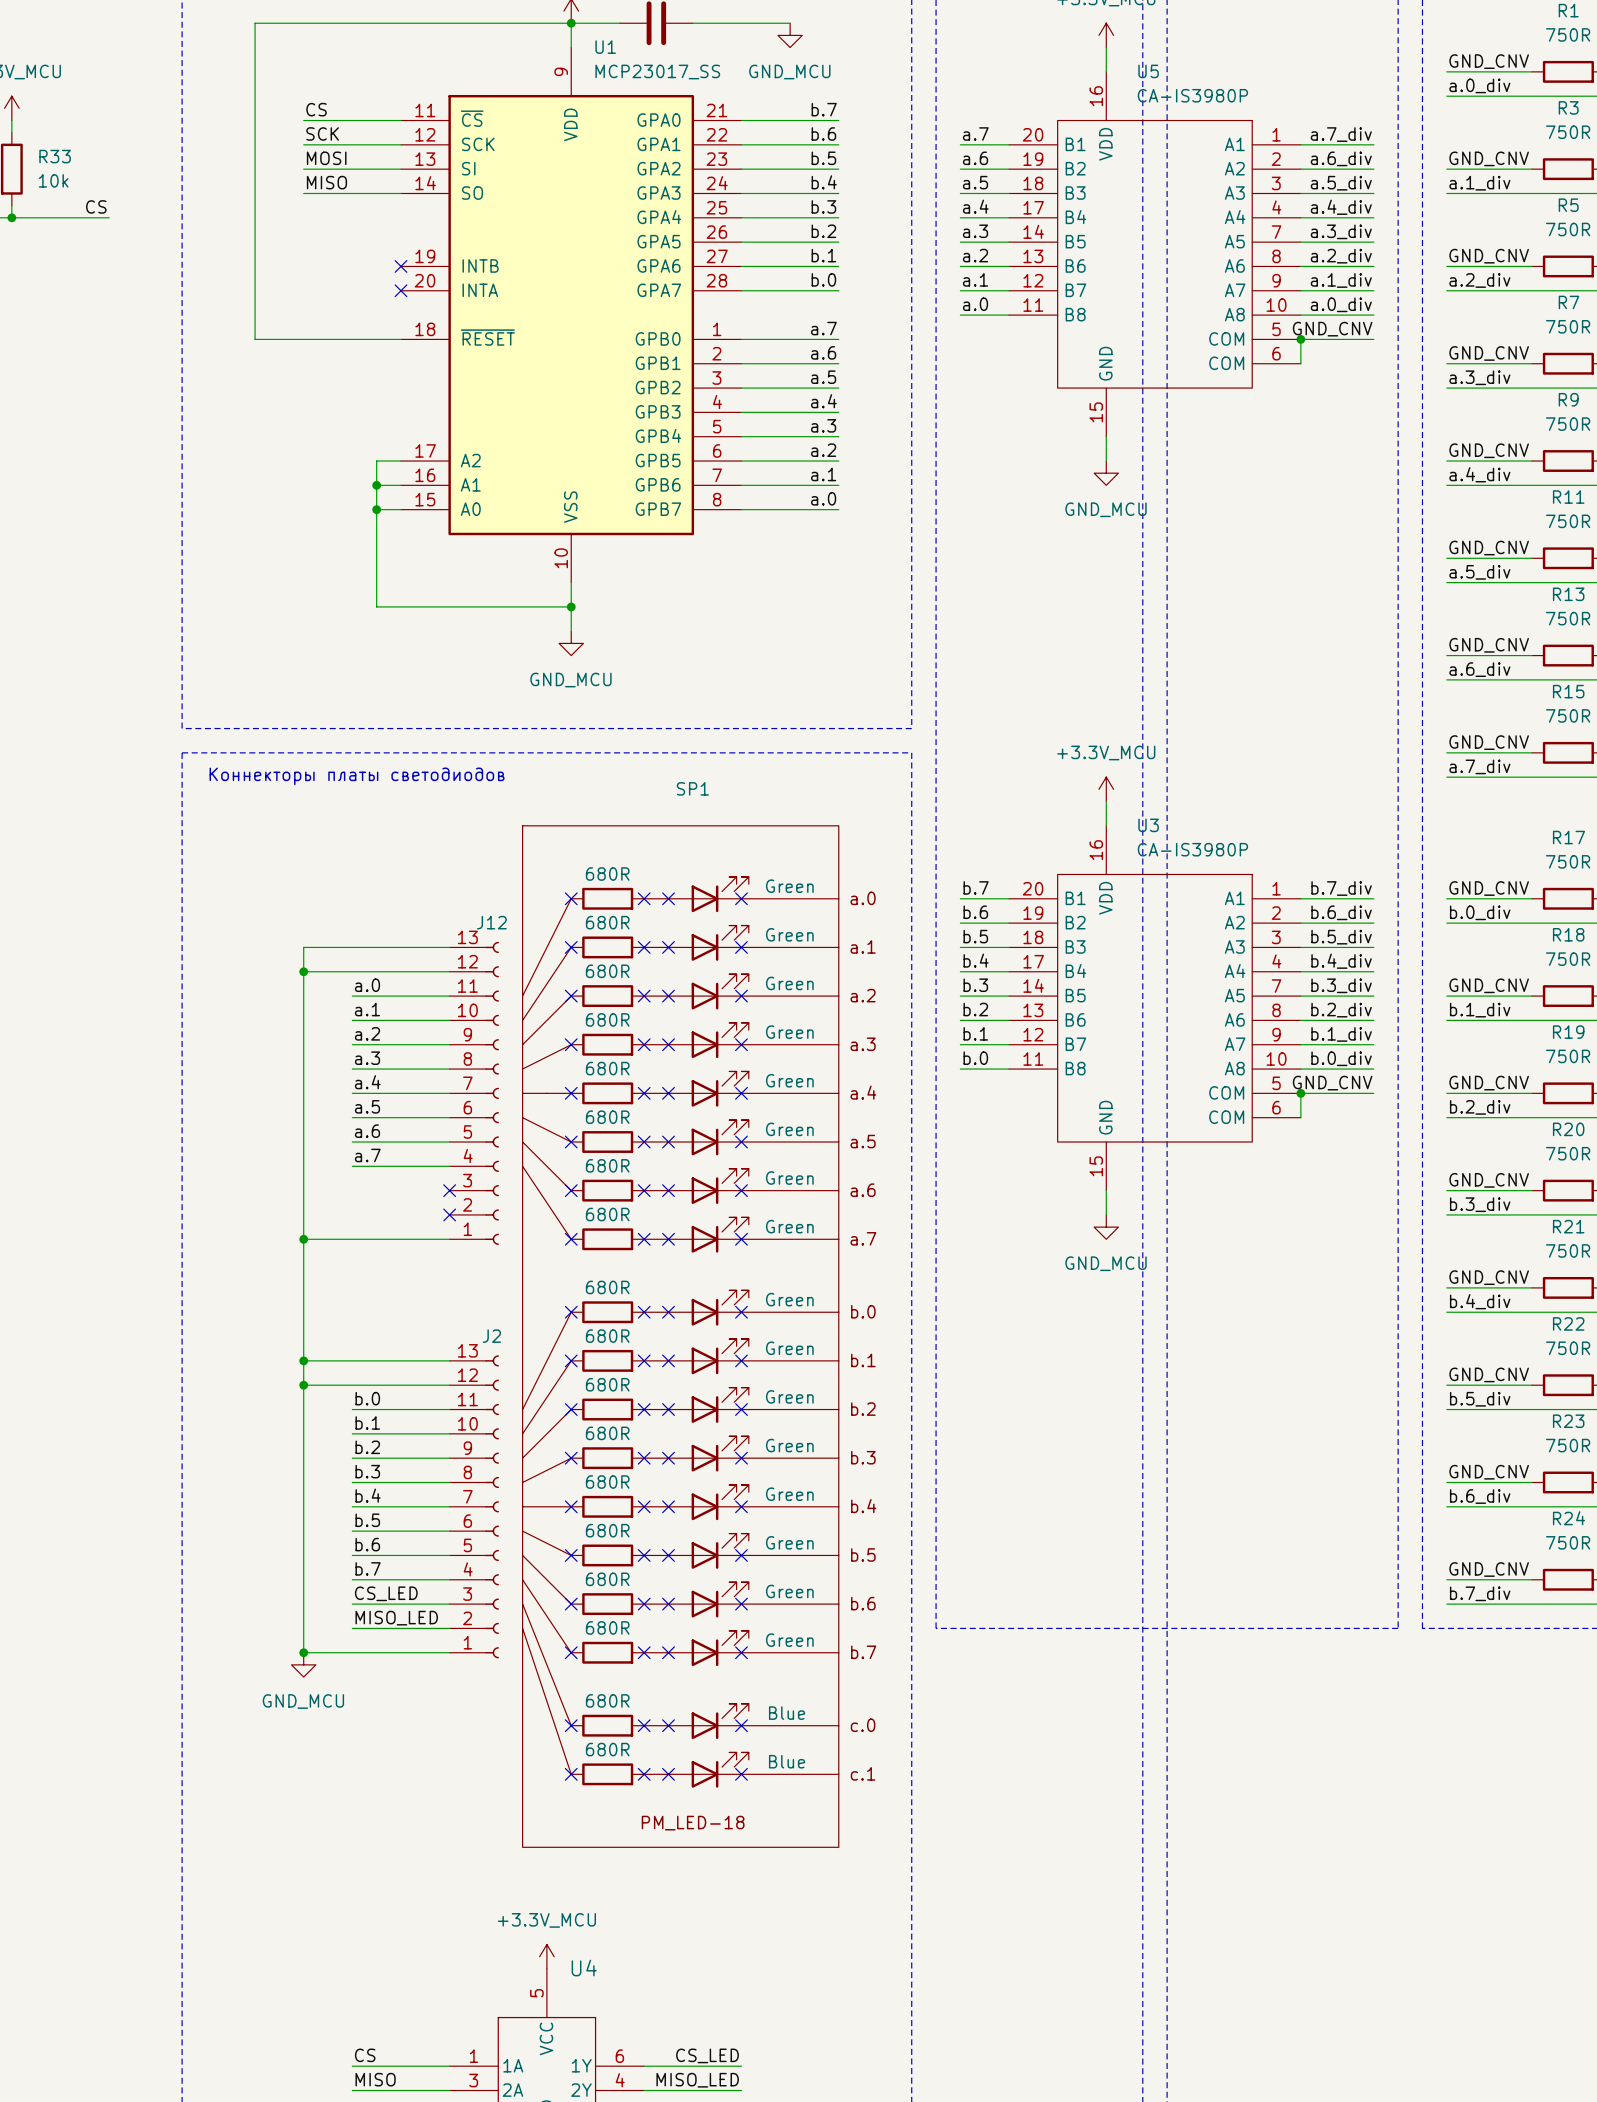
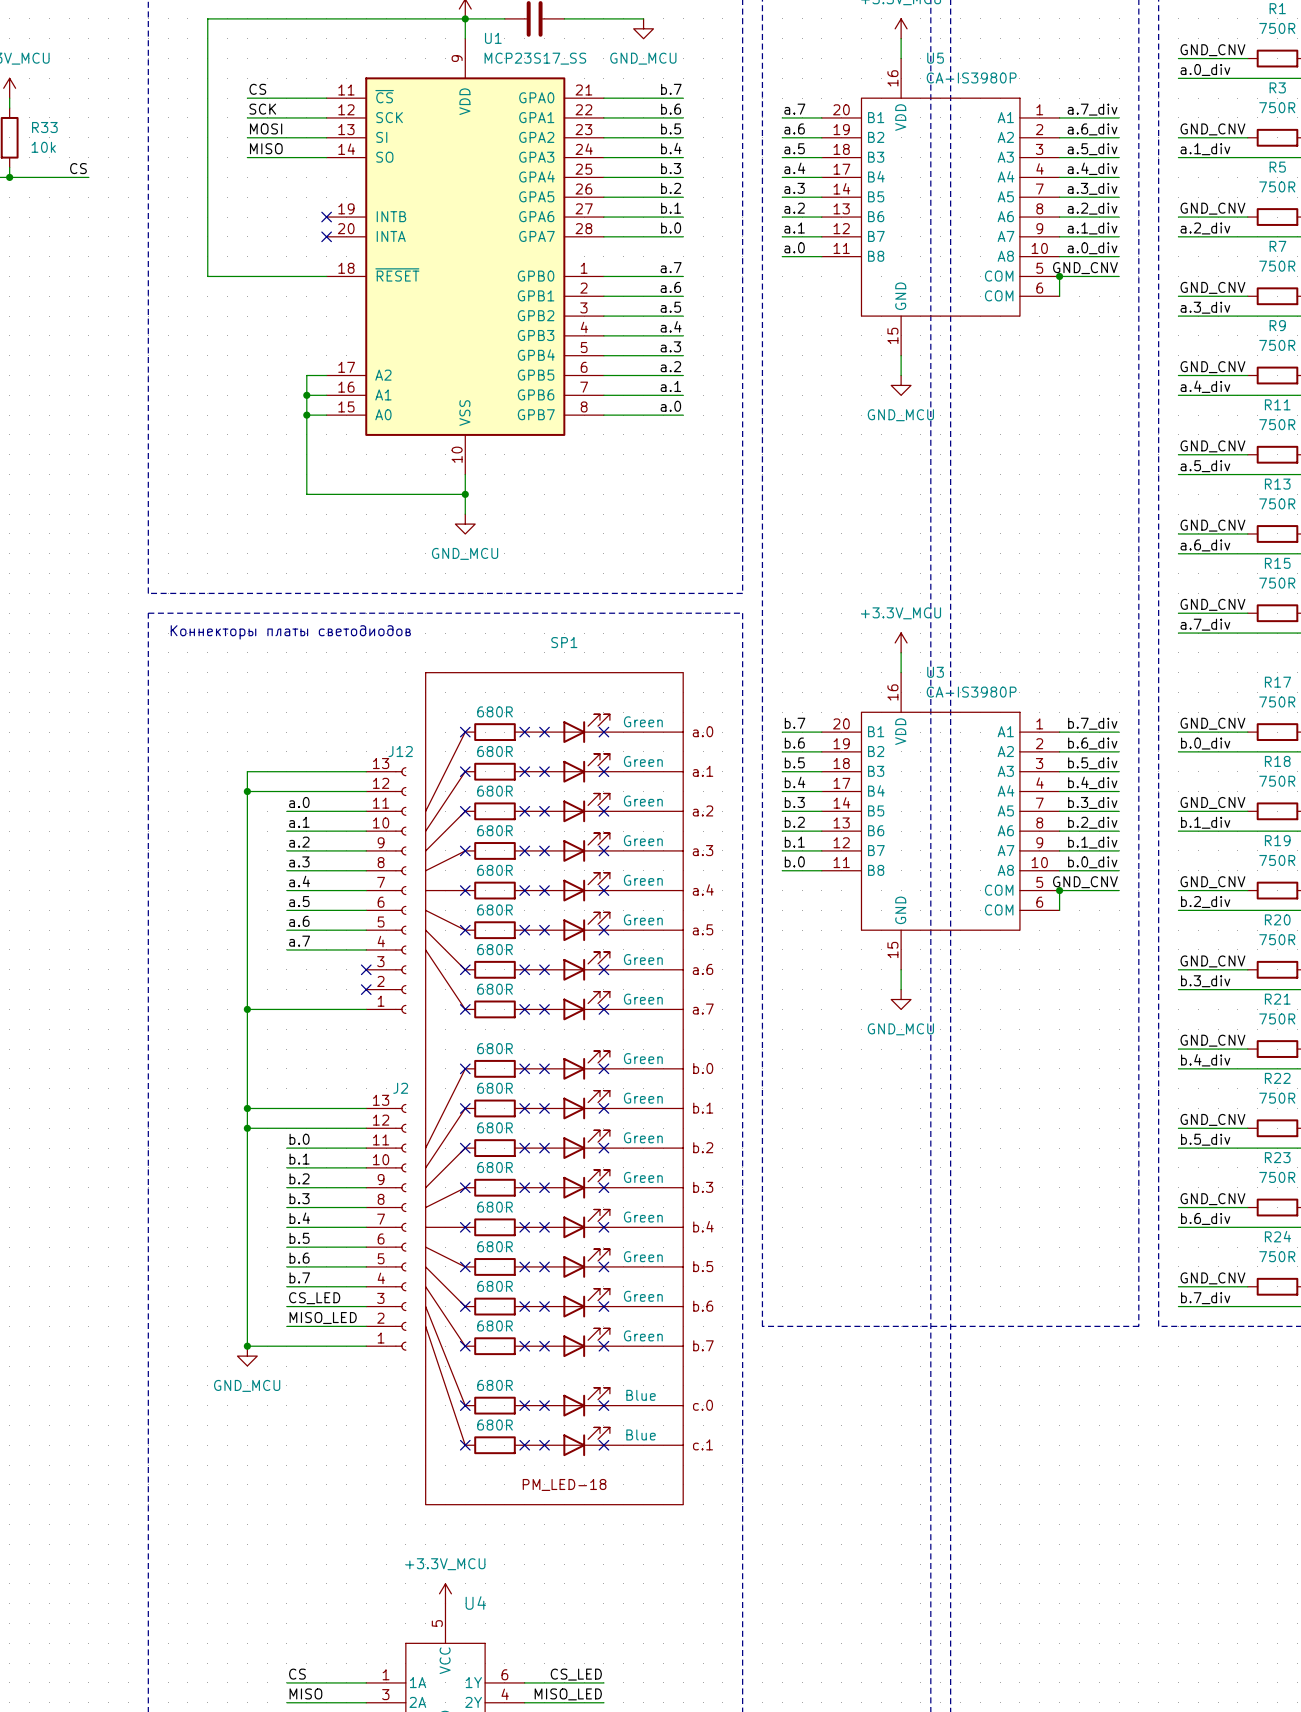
U1 value: MCP23017_SS (657, 72) -> MCP23S17_SS (535, 58)

